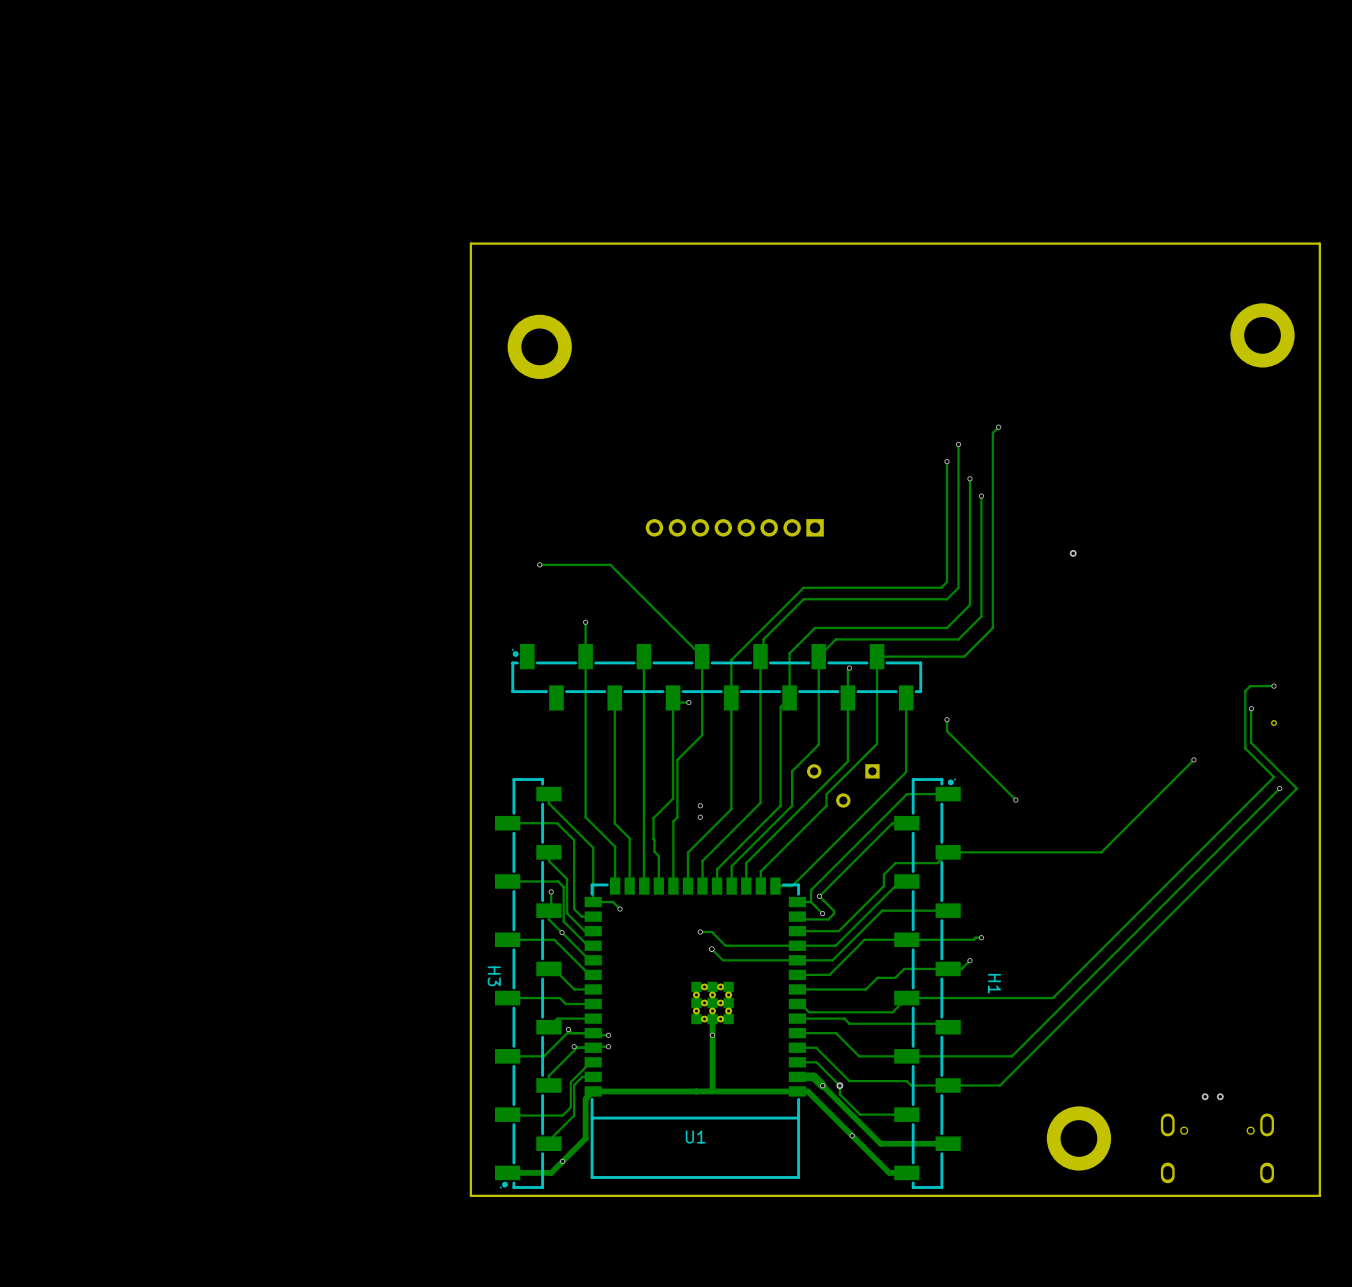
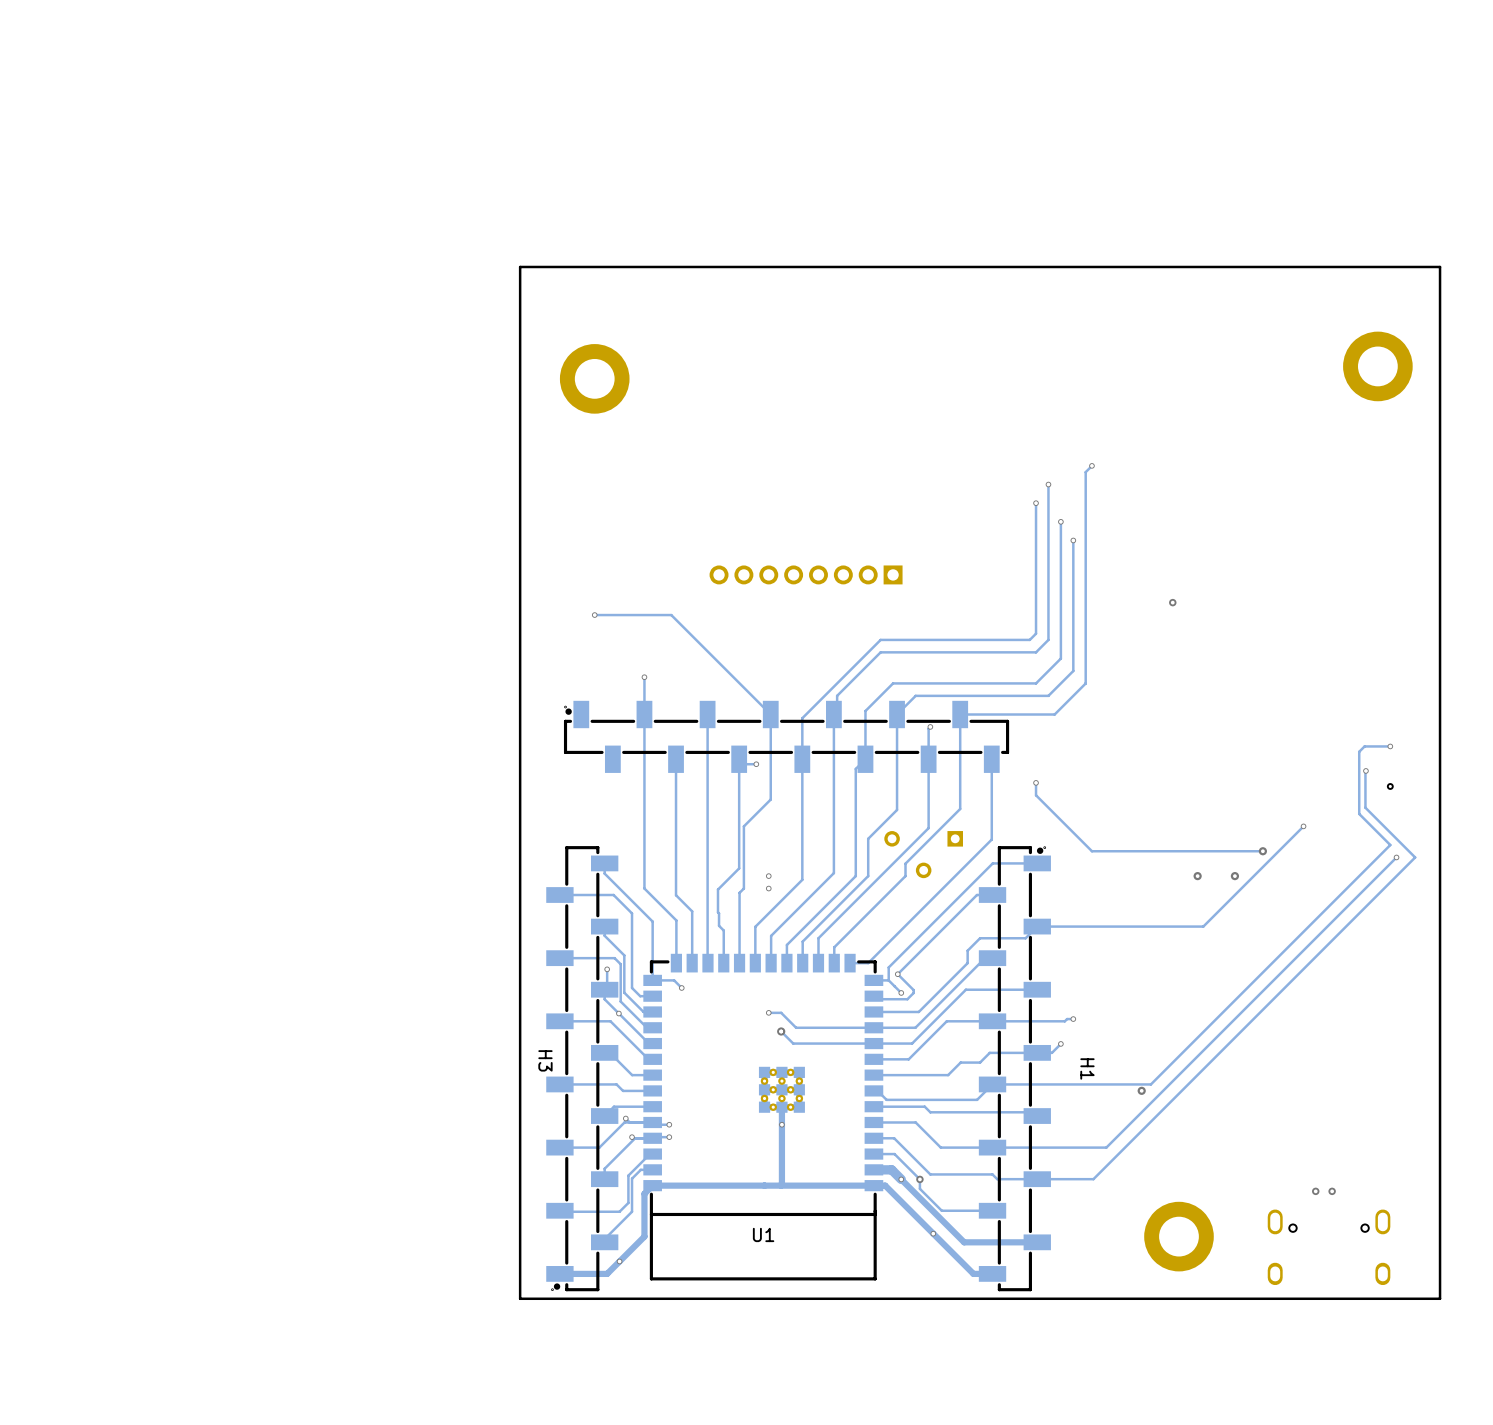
track: (998, 782) (1015, 800) -> (1091, 851) (1262, 851)
via: none -> (1262, 851)
via: (1015, 800) -> none
via: none -> (1197, 876)
via: none -> (1234, 876)
via: none -> (781, 1031)
via: none -> (1141, 1090)

